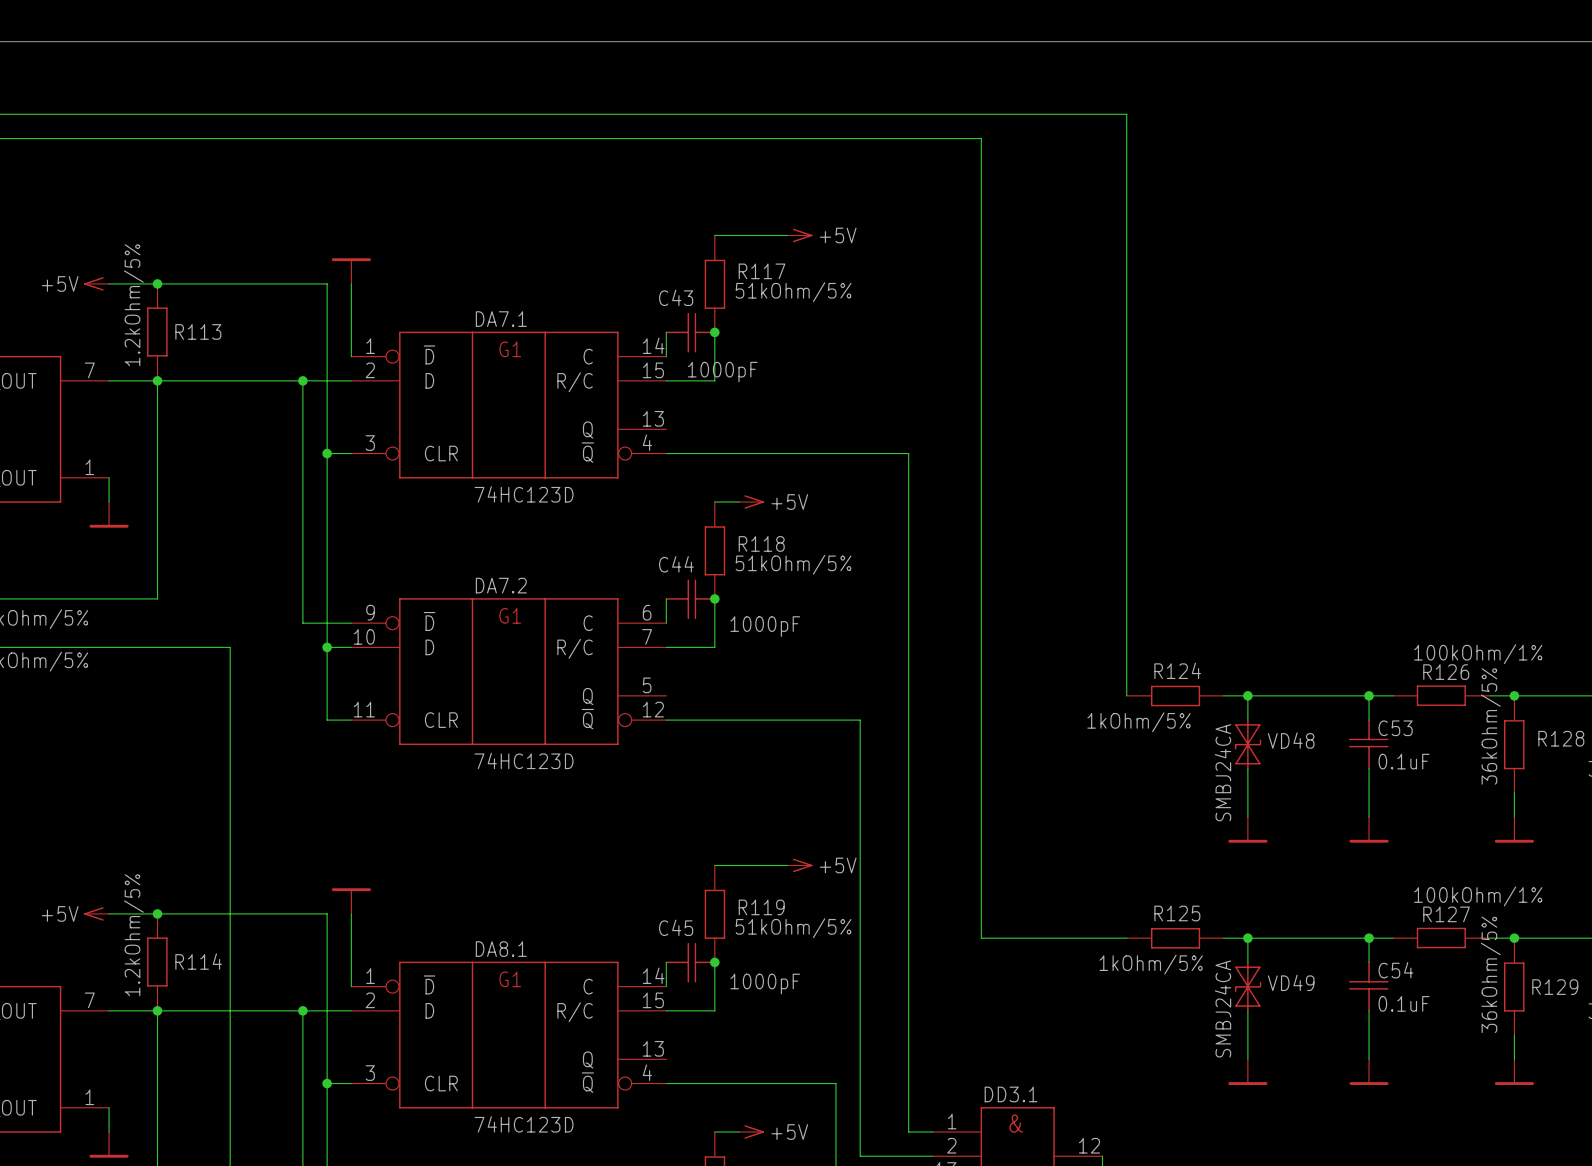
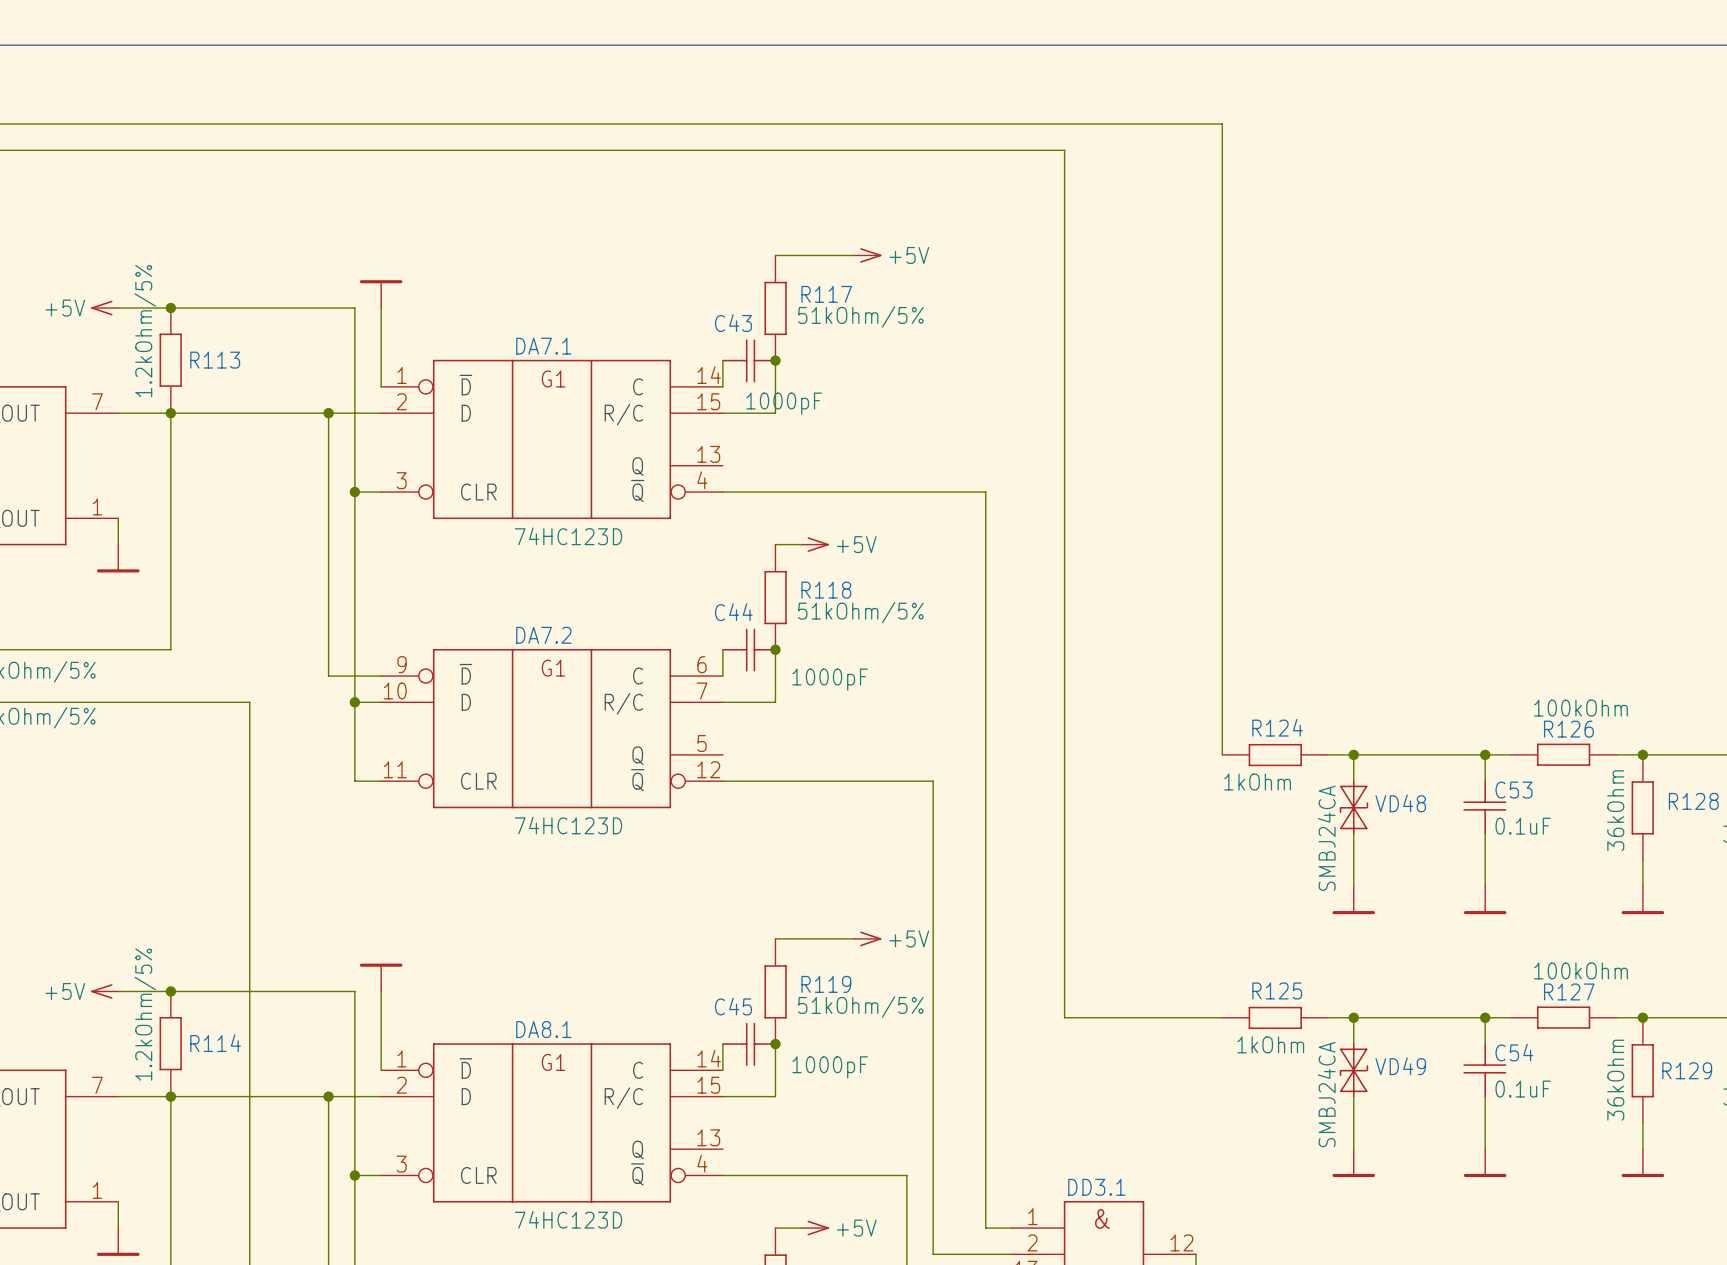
R126 value: 100kOhm/1% (1478, 654) -> 100kOhm (1581, 708)
R124 value: 1kOhm/5% (1139, 722) -> 1kOhm (1257, 782)
R128 value: 36kOhm/5% (1490, 726) -> 36kOhm (1615, 810)
R127 value: 100kOhm/1% (1478, 896) -> 100kOhm (1581, 970)
R125 value: 1kOhm/5% (1151, 964) -> 1kOhm (1270, 1044)
R129 value: 36kOhm/5% (1490, 974) -> 36kOhm (1615, 1080)

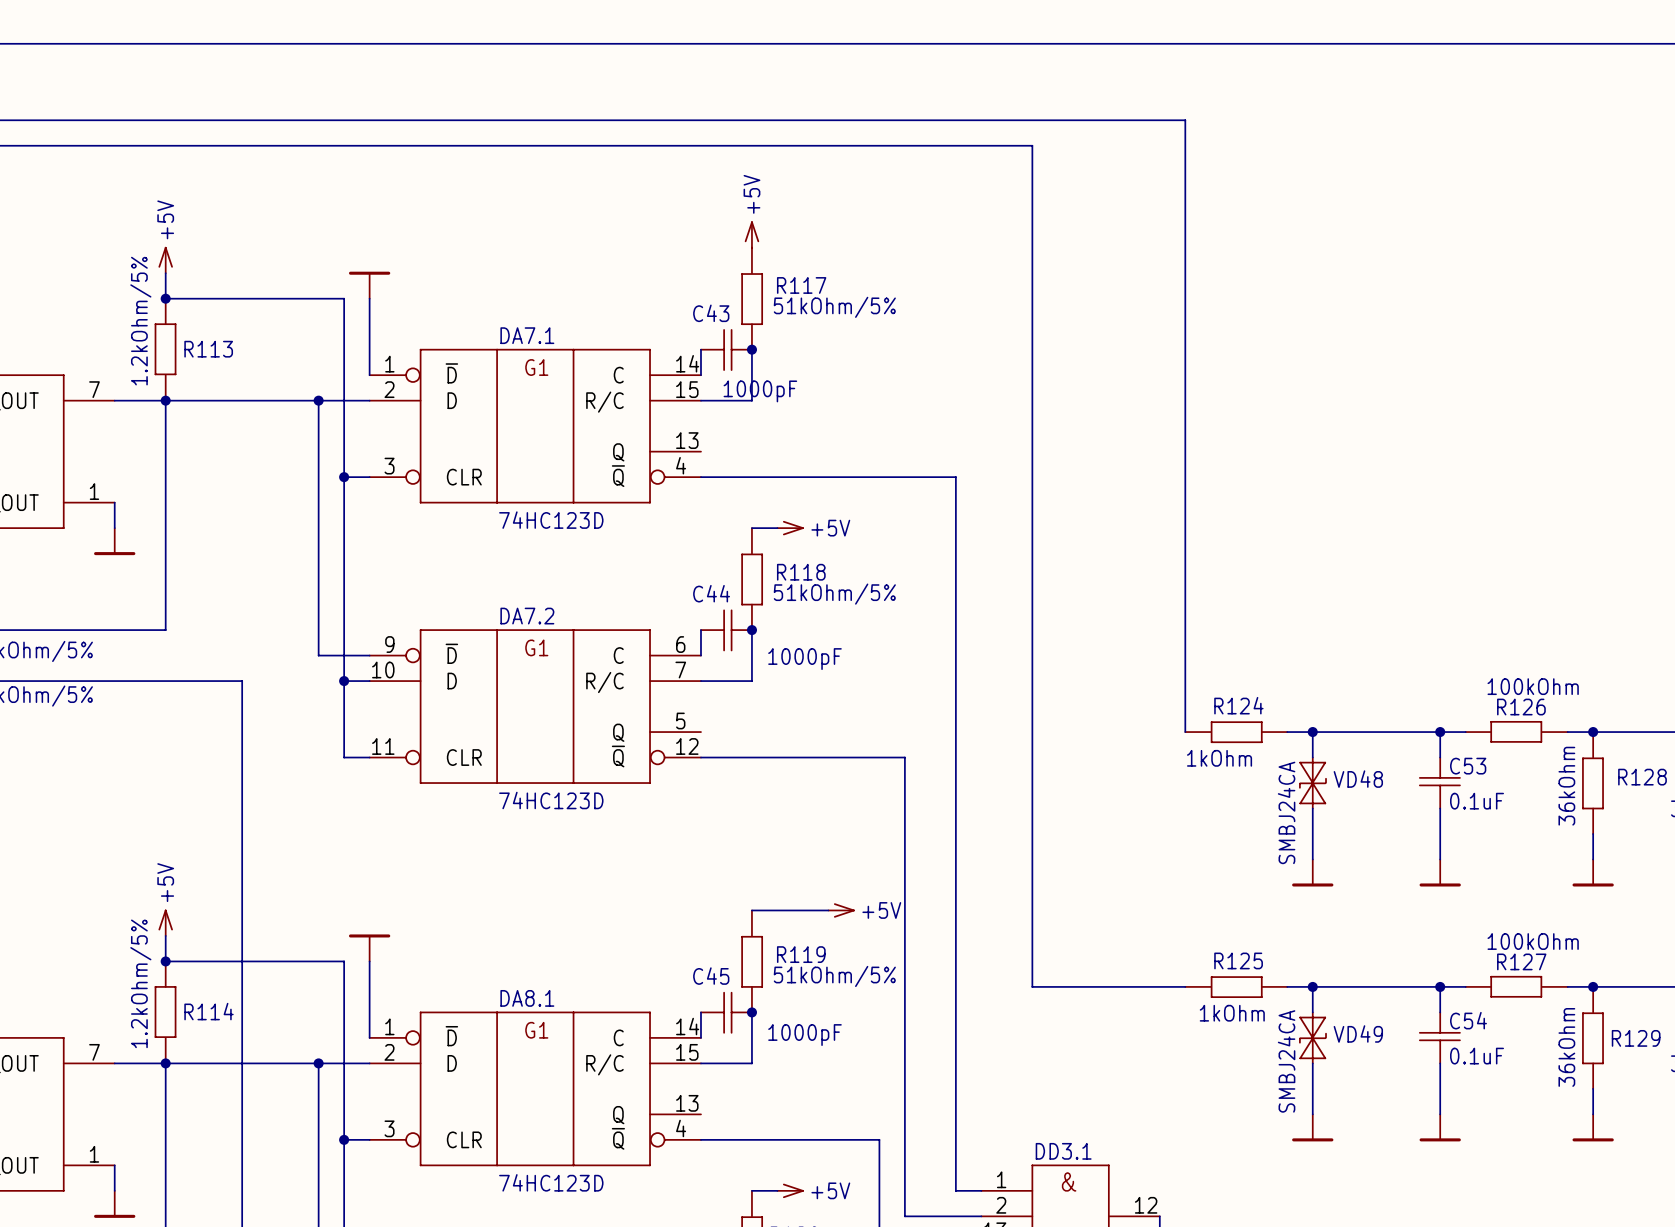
wire: (775, 255) (854, 255) -> none
power symbol position: +5V (867, 255) -> +5V (751, 234)
power symbol rotation: 0° (870, 255) -> 90° counterclockwise (751, 231)
power symbol rotation: 0° (101, 308) -> 90° clockwise (165, 257)
power symbol position: +5V (104, 308) -> +5V (165, 260)
wire: (118, 308) (170, 308) -> (165, 273) (165, 298)
power symbol rotation: 0° (101, 991) -> 90° clockwise (165, 920)
power symbol position: +5V (104, 991) -> +5V (165, 922)
wire: (118, 991) (170, 991) -> (165, 935) (165, 961)

